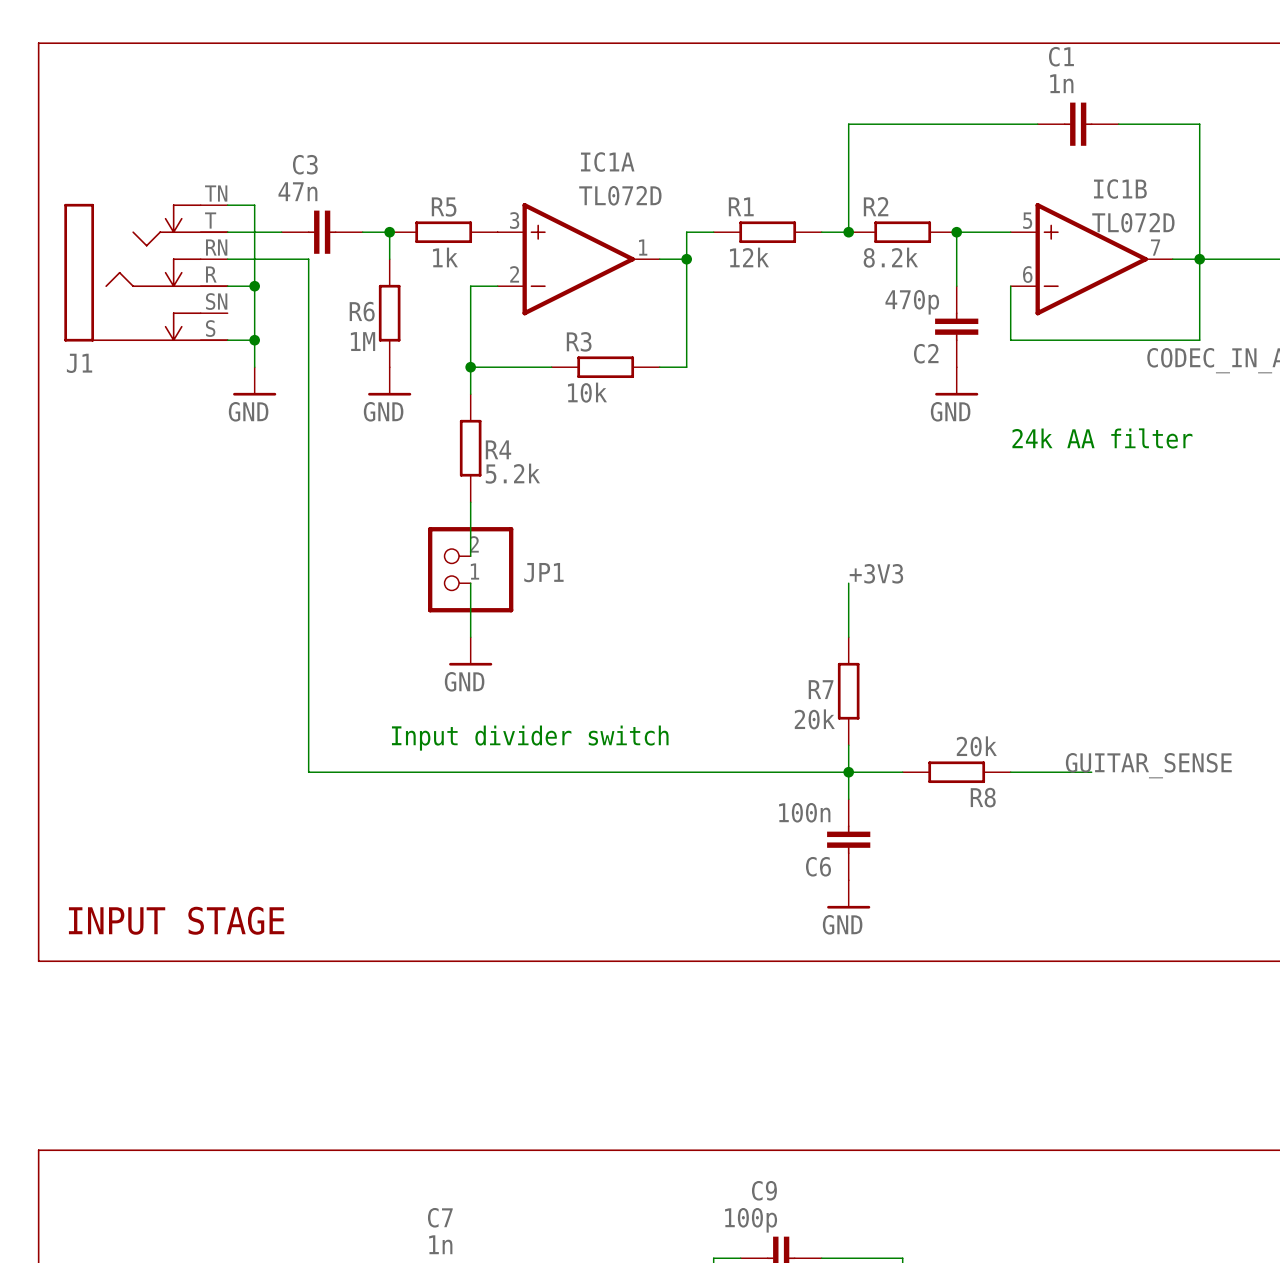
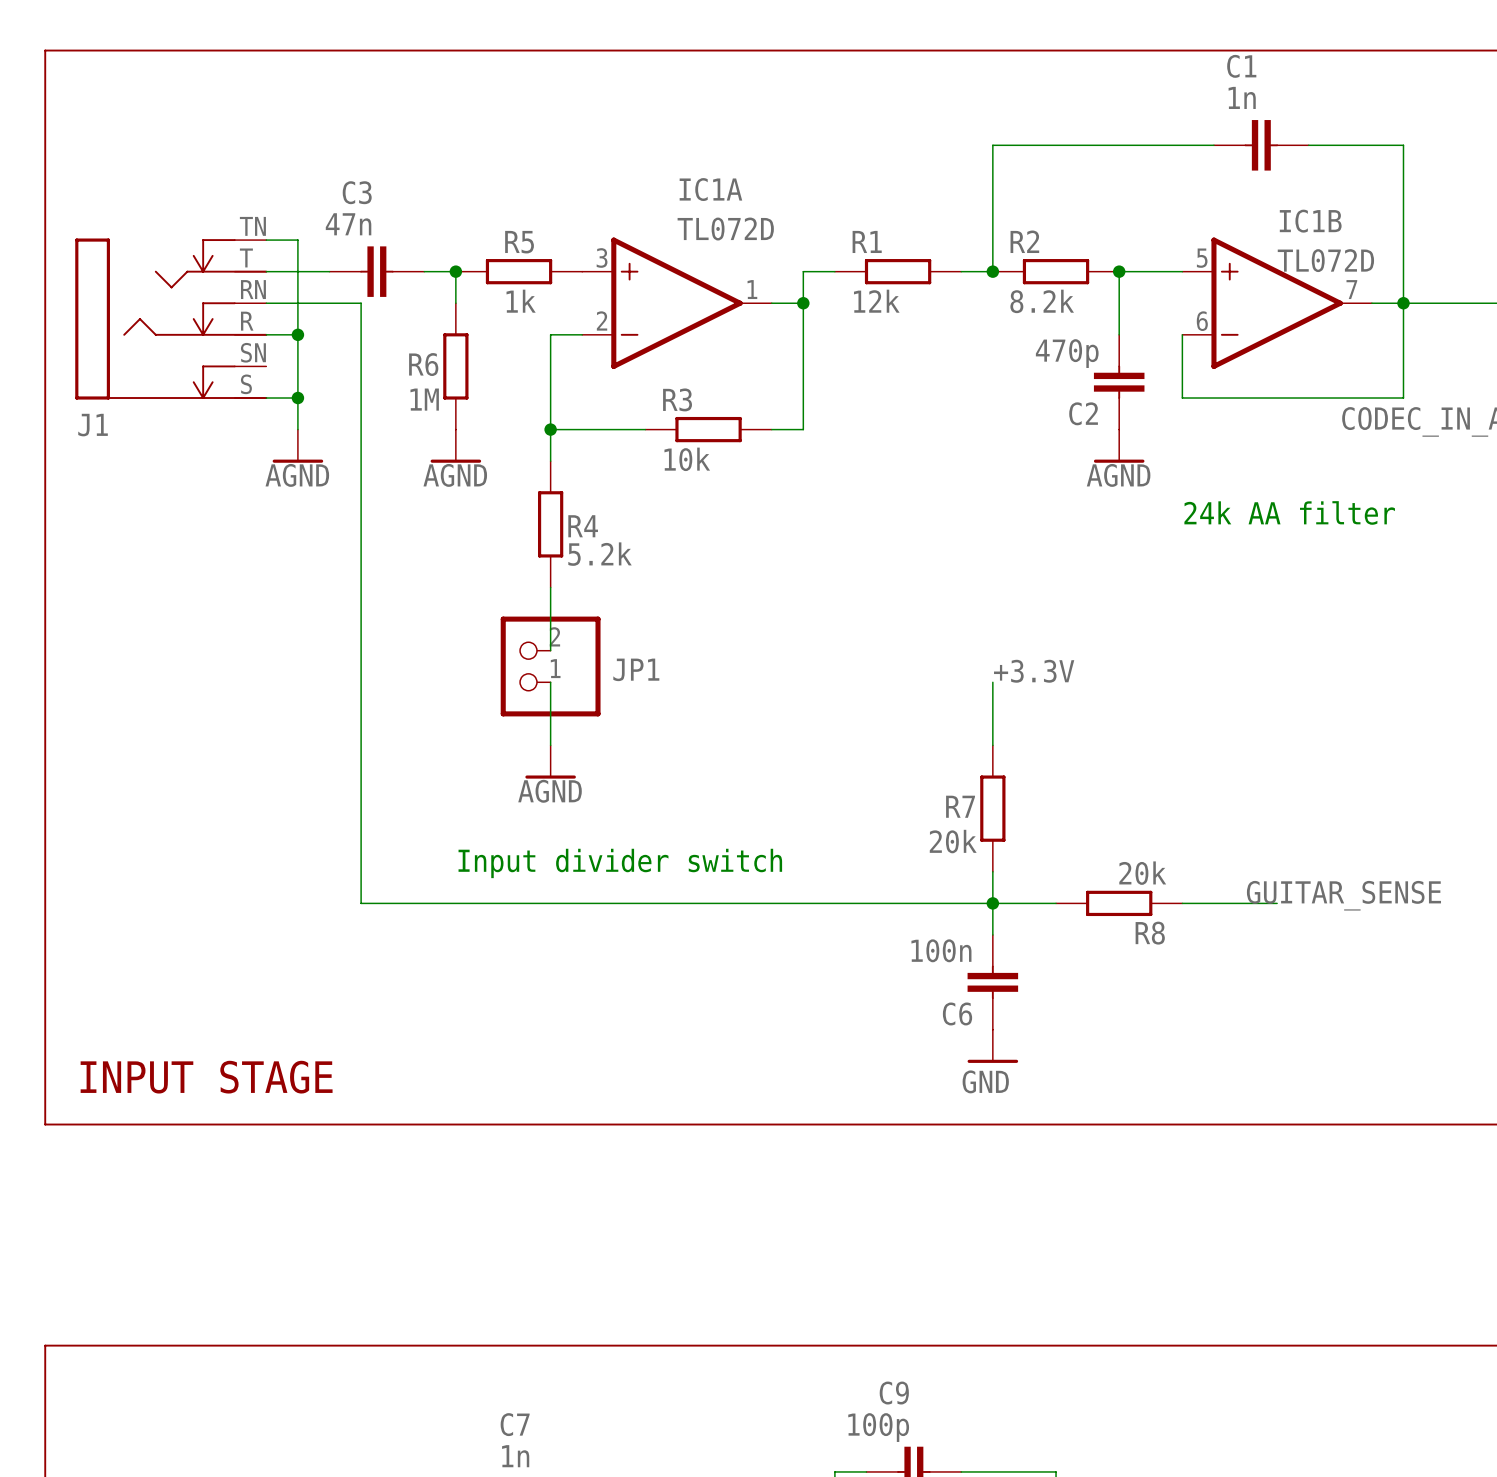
power symbol: GND (254, 381) -> AGND (297, 446)
power symbol: GND (389, 381) -> AGND (455, 446)
power symbol: GND (956, 381) -> AGND (1119, 446)
label: +3V3 (876, 573) -> +3.3V (1034, 671)
power symbol: GND (470, 651) -> AGND (550, 762)

